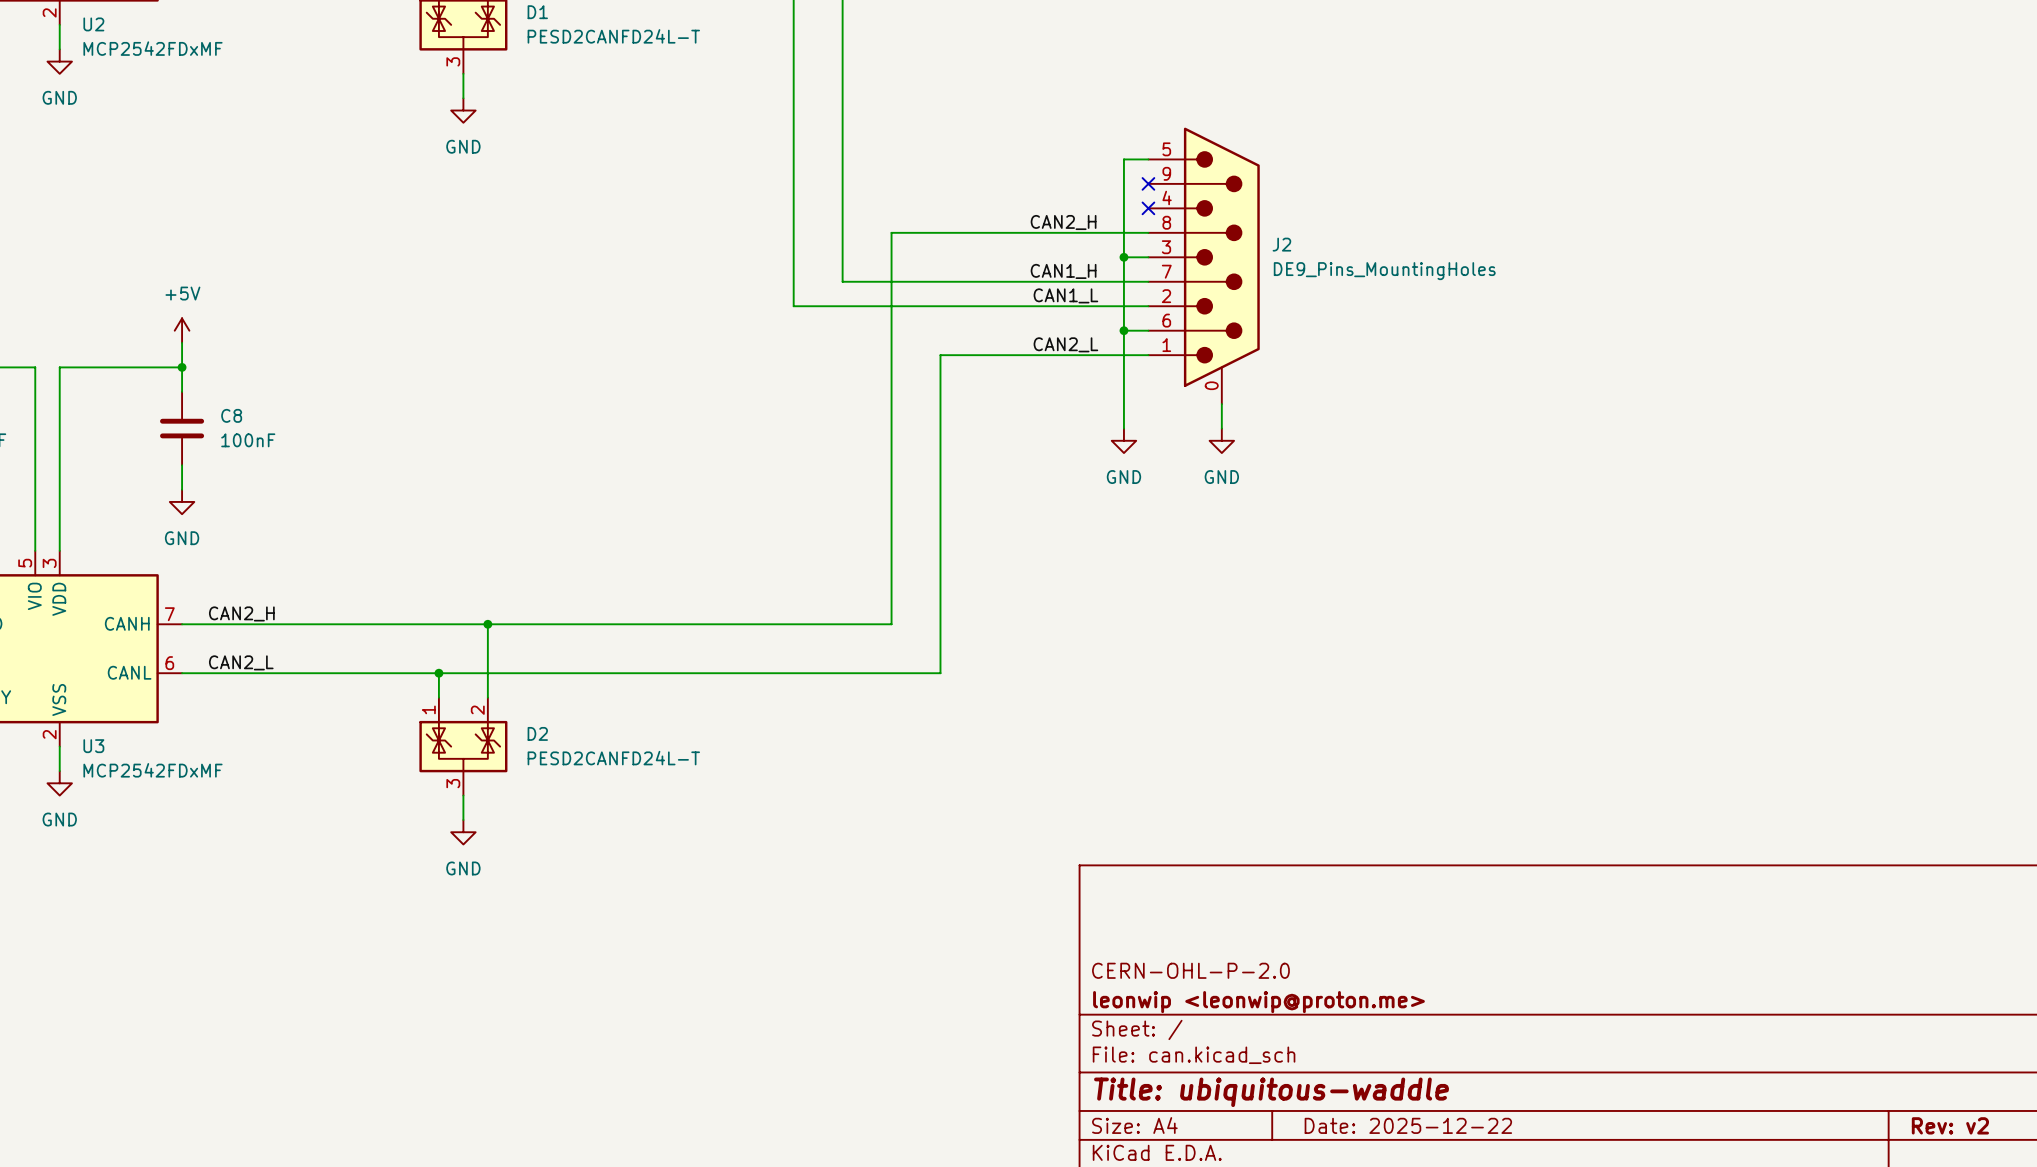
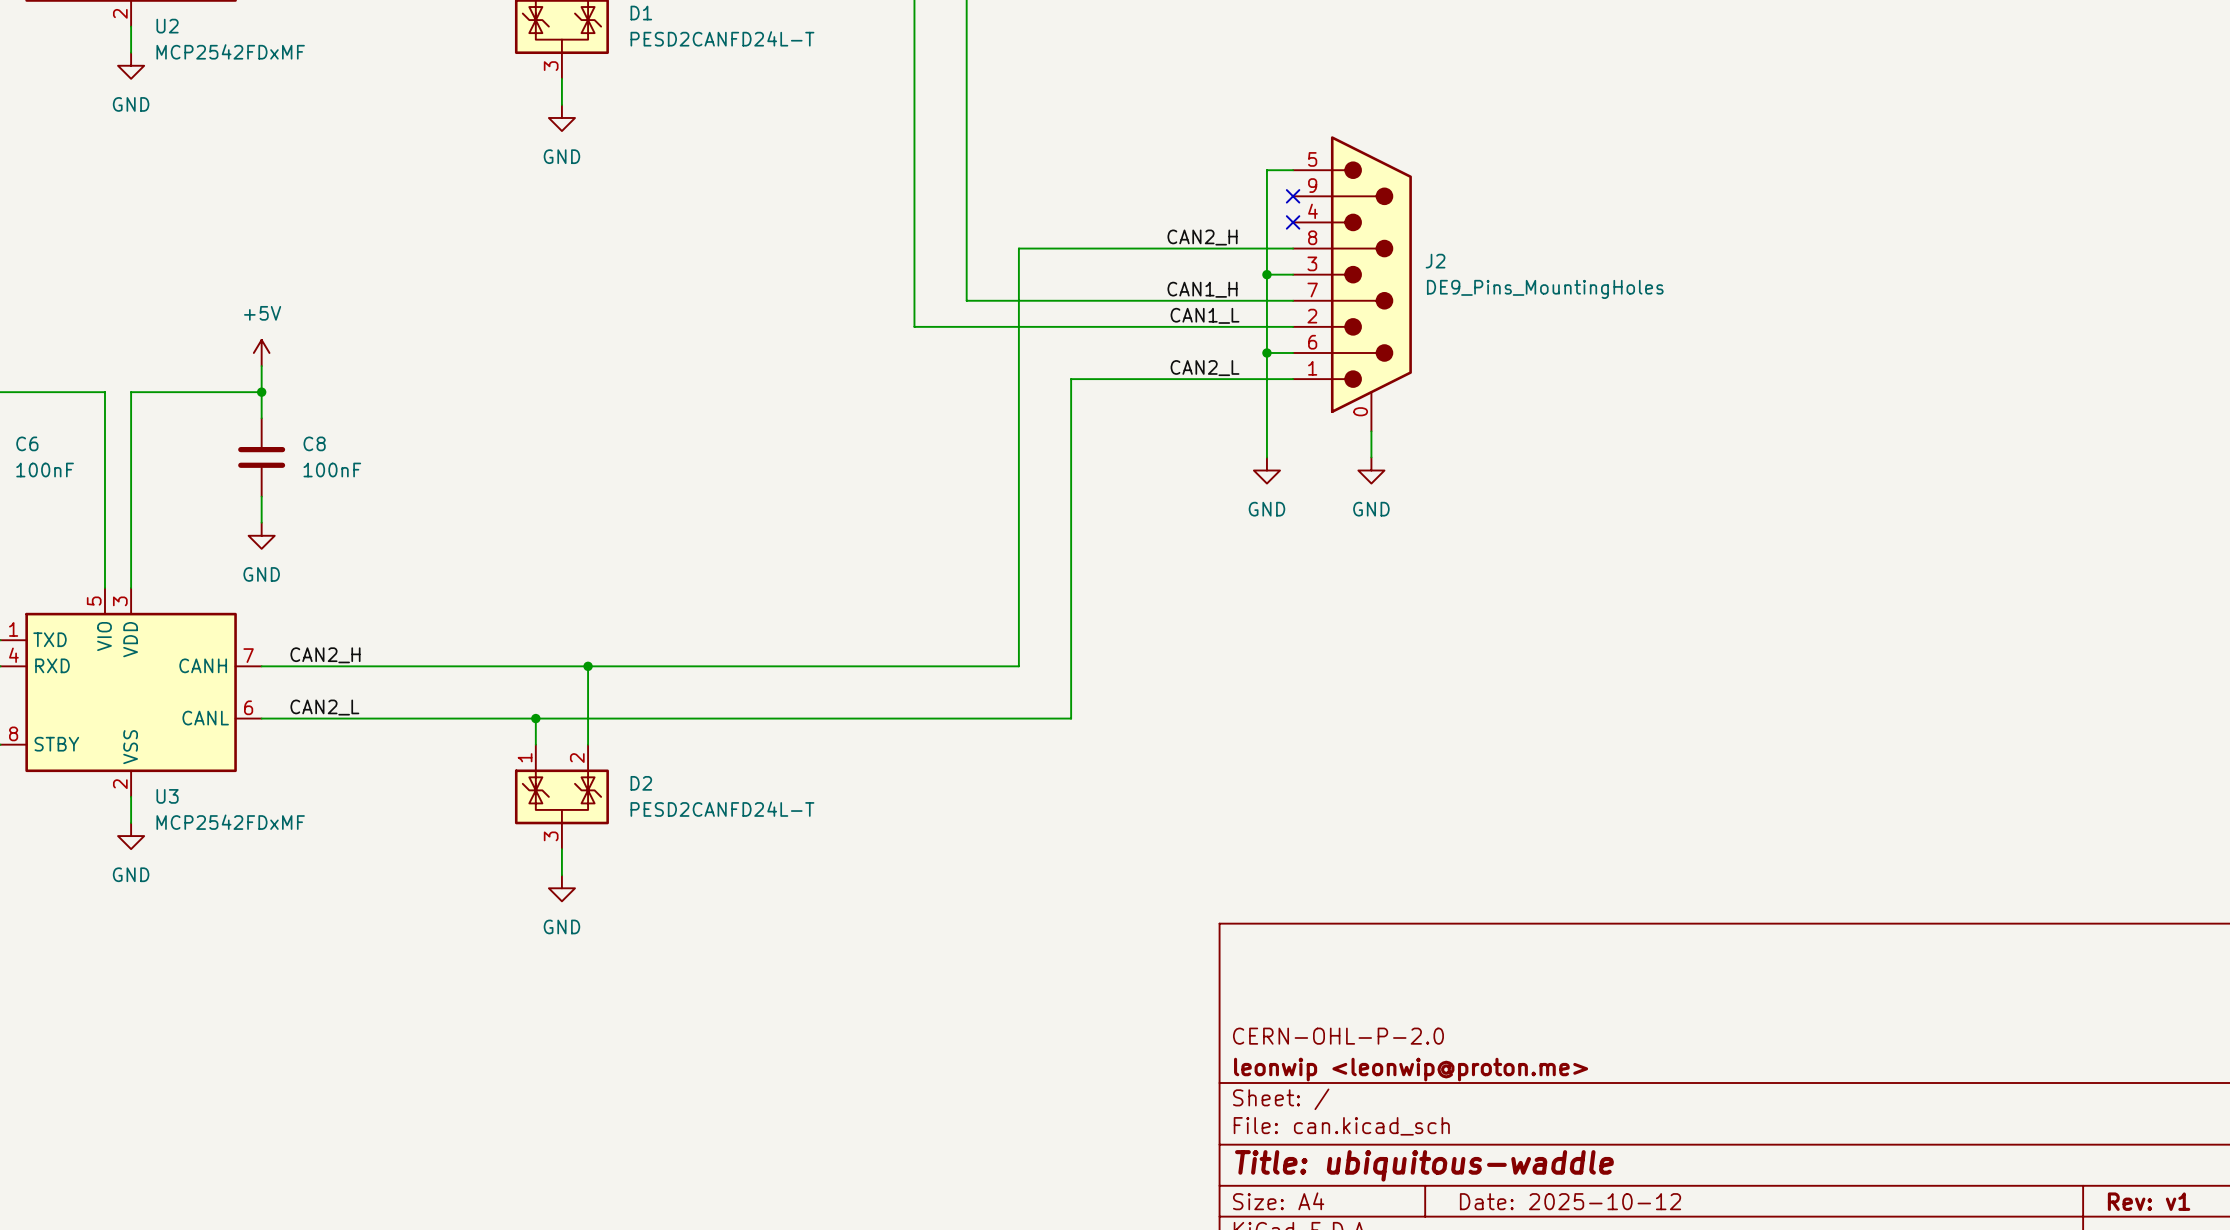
title block: Date: 2025-12-22 (1408, 1125) -> Date: 2025-10-12 (1570, 1201)
title block: Rev: v2 (1950, 1125) -> Rev: v1 (2149, 1201)

